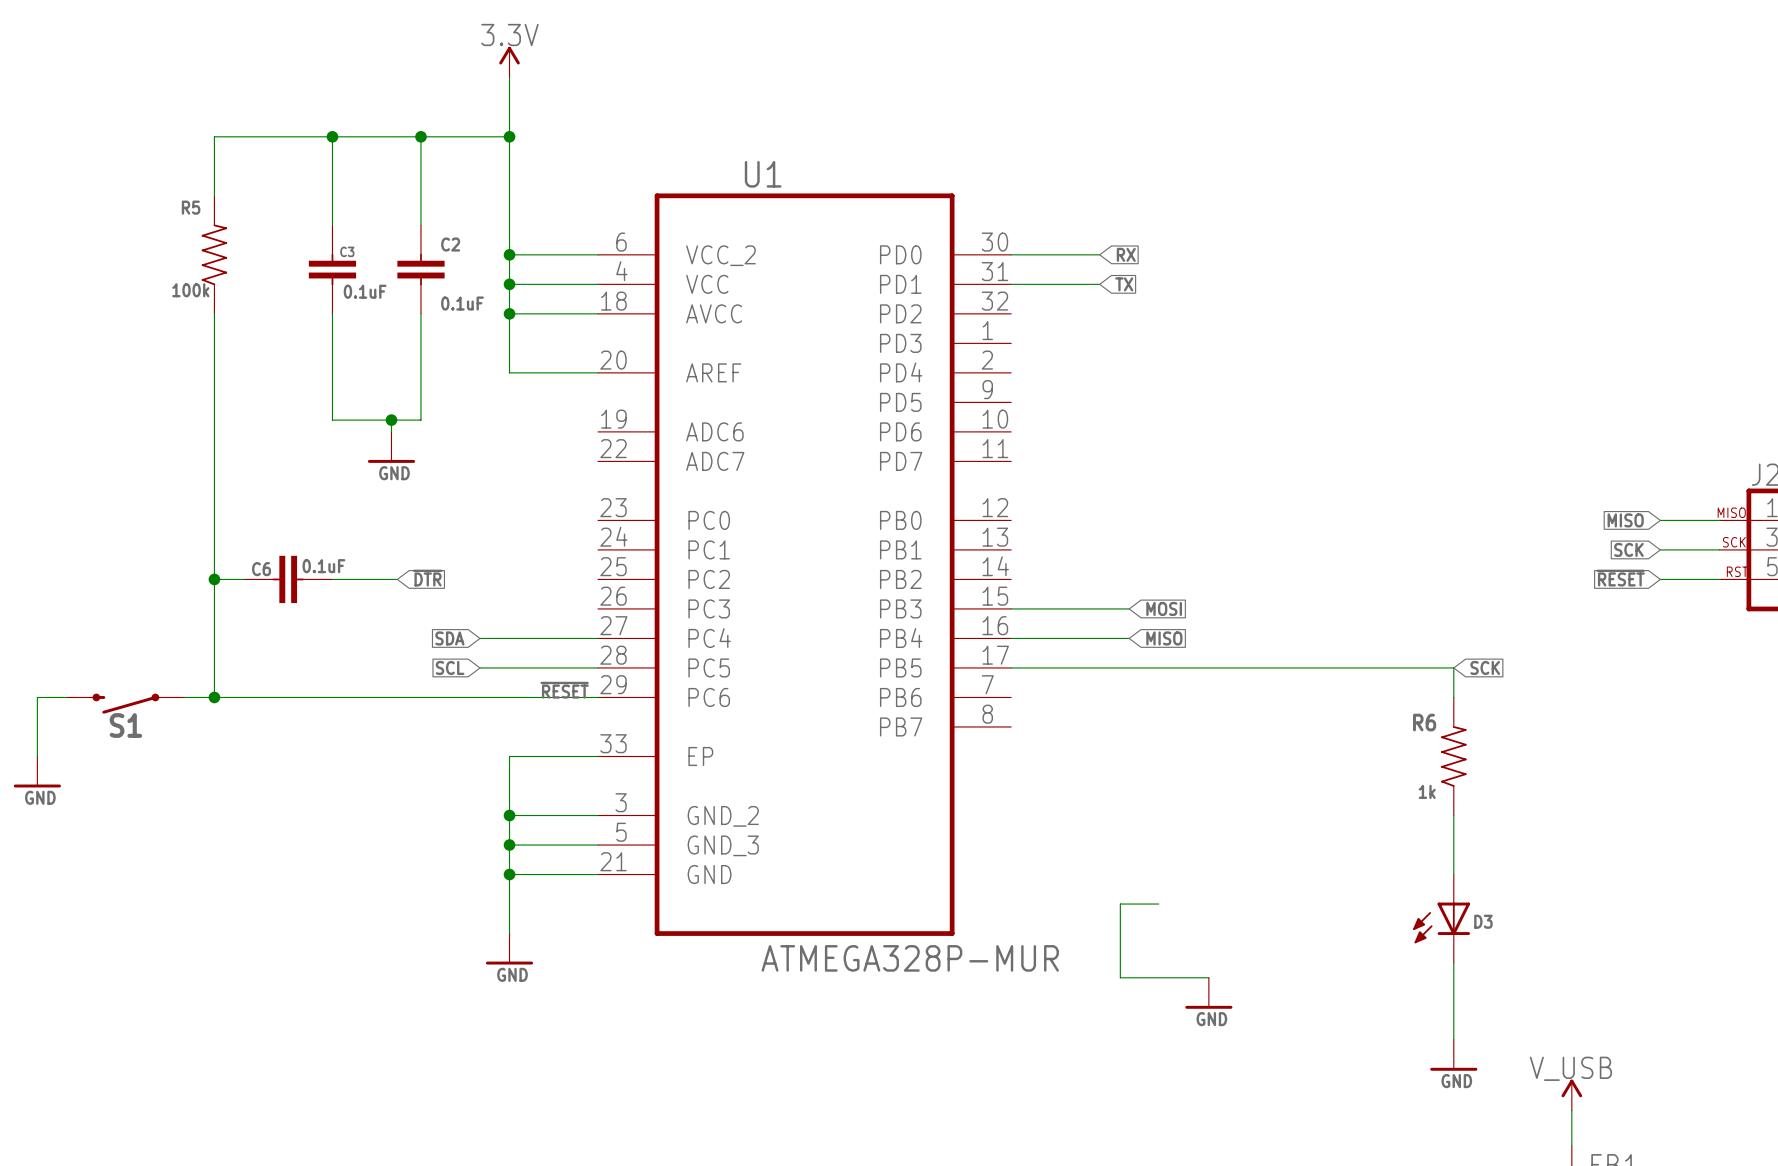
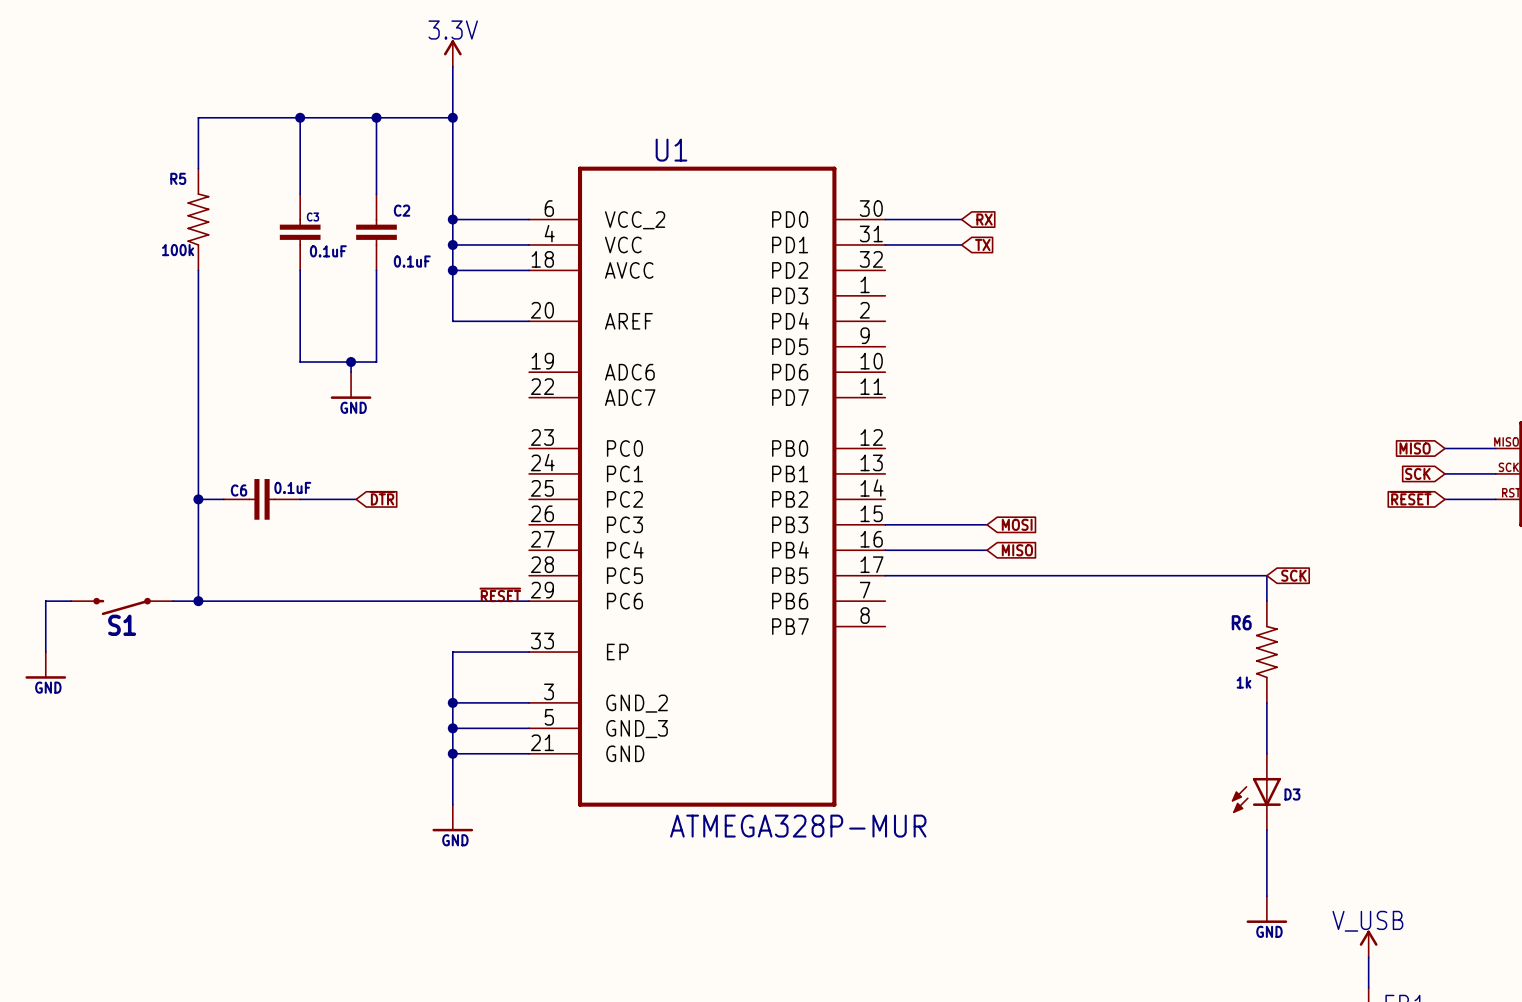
global label: SDA (449, 638) -> none
wire: (480, 638) (598, 638) -> none
global label: SCL (450, 667) -> none
wire: (480, 667) (598, 667) -> none
wire: (1158, 904) (1120, 904) (1120, 977) (1208, 977) -> none
power symbol: GND (1208, 993) -> none

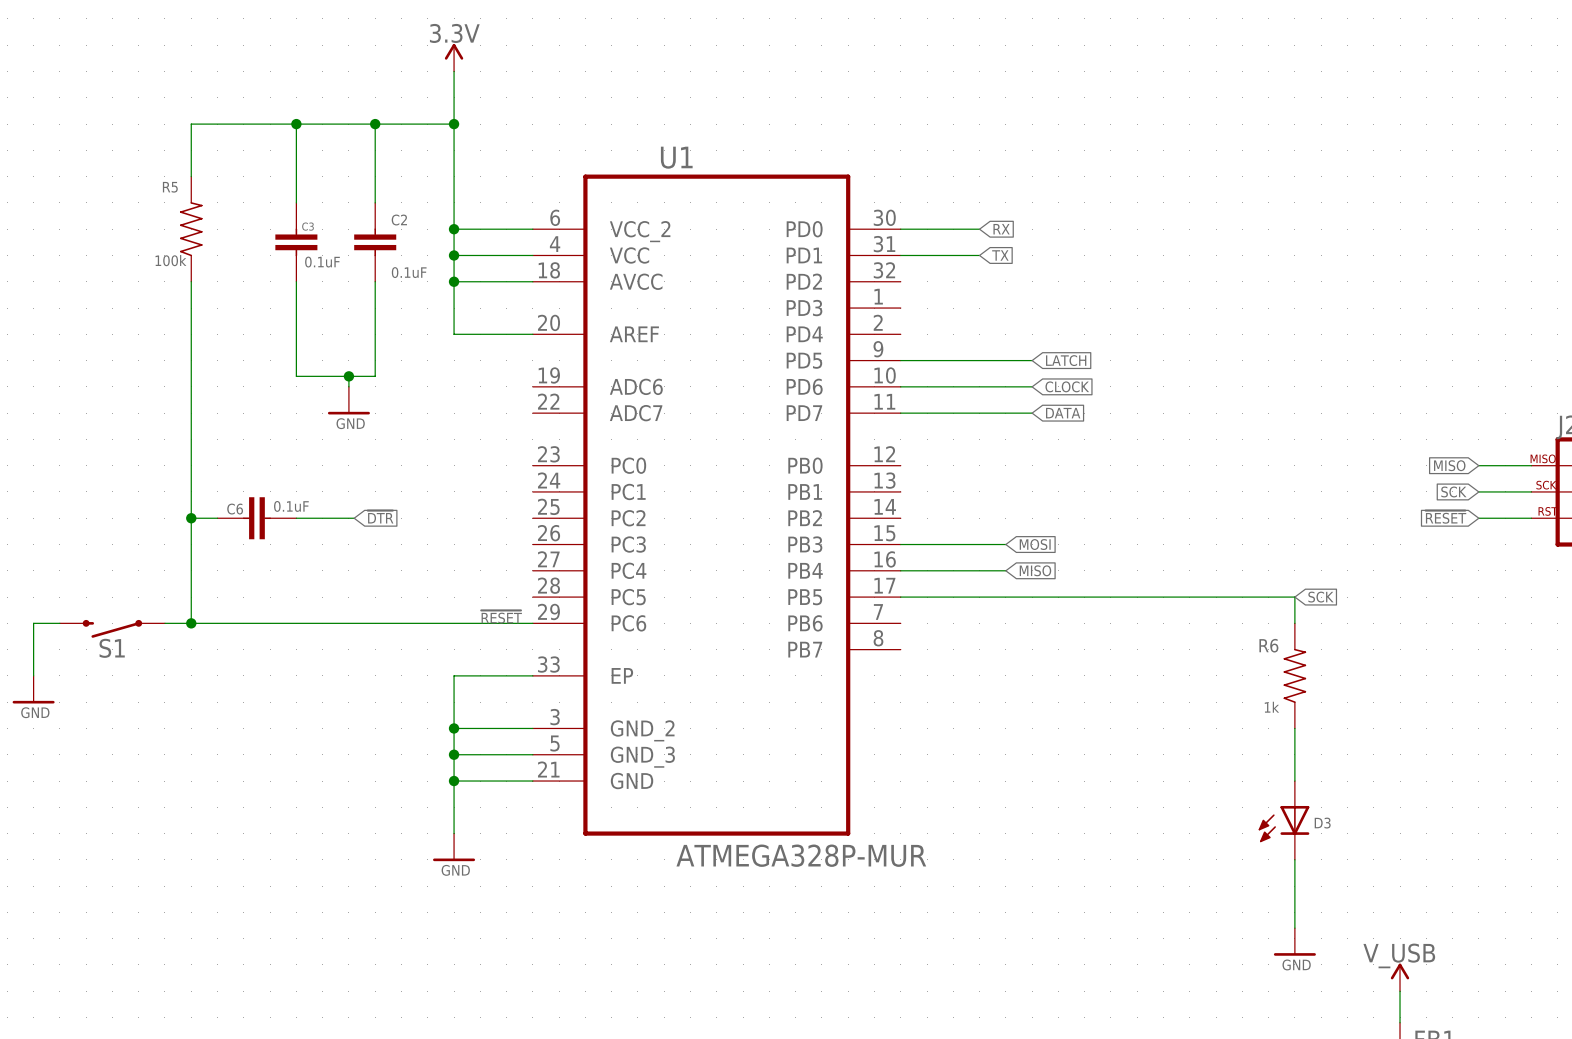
wire: none -> (900, 360) (1032, 360)
global label: none -> LATCH (1066, 360)
wire: none -> (900, 386) (1032, 386)
global label: none -> CLOCK (1067, 386)
wire: none -> (900, 413) (1032, 413)
global label: none -> DATA (1063, 413)

